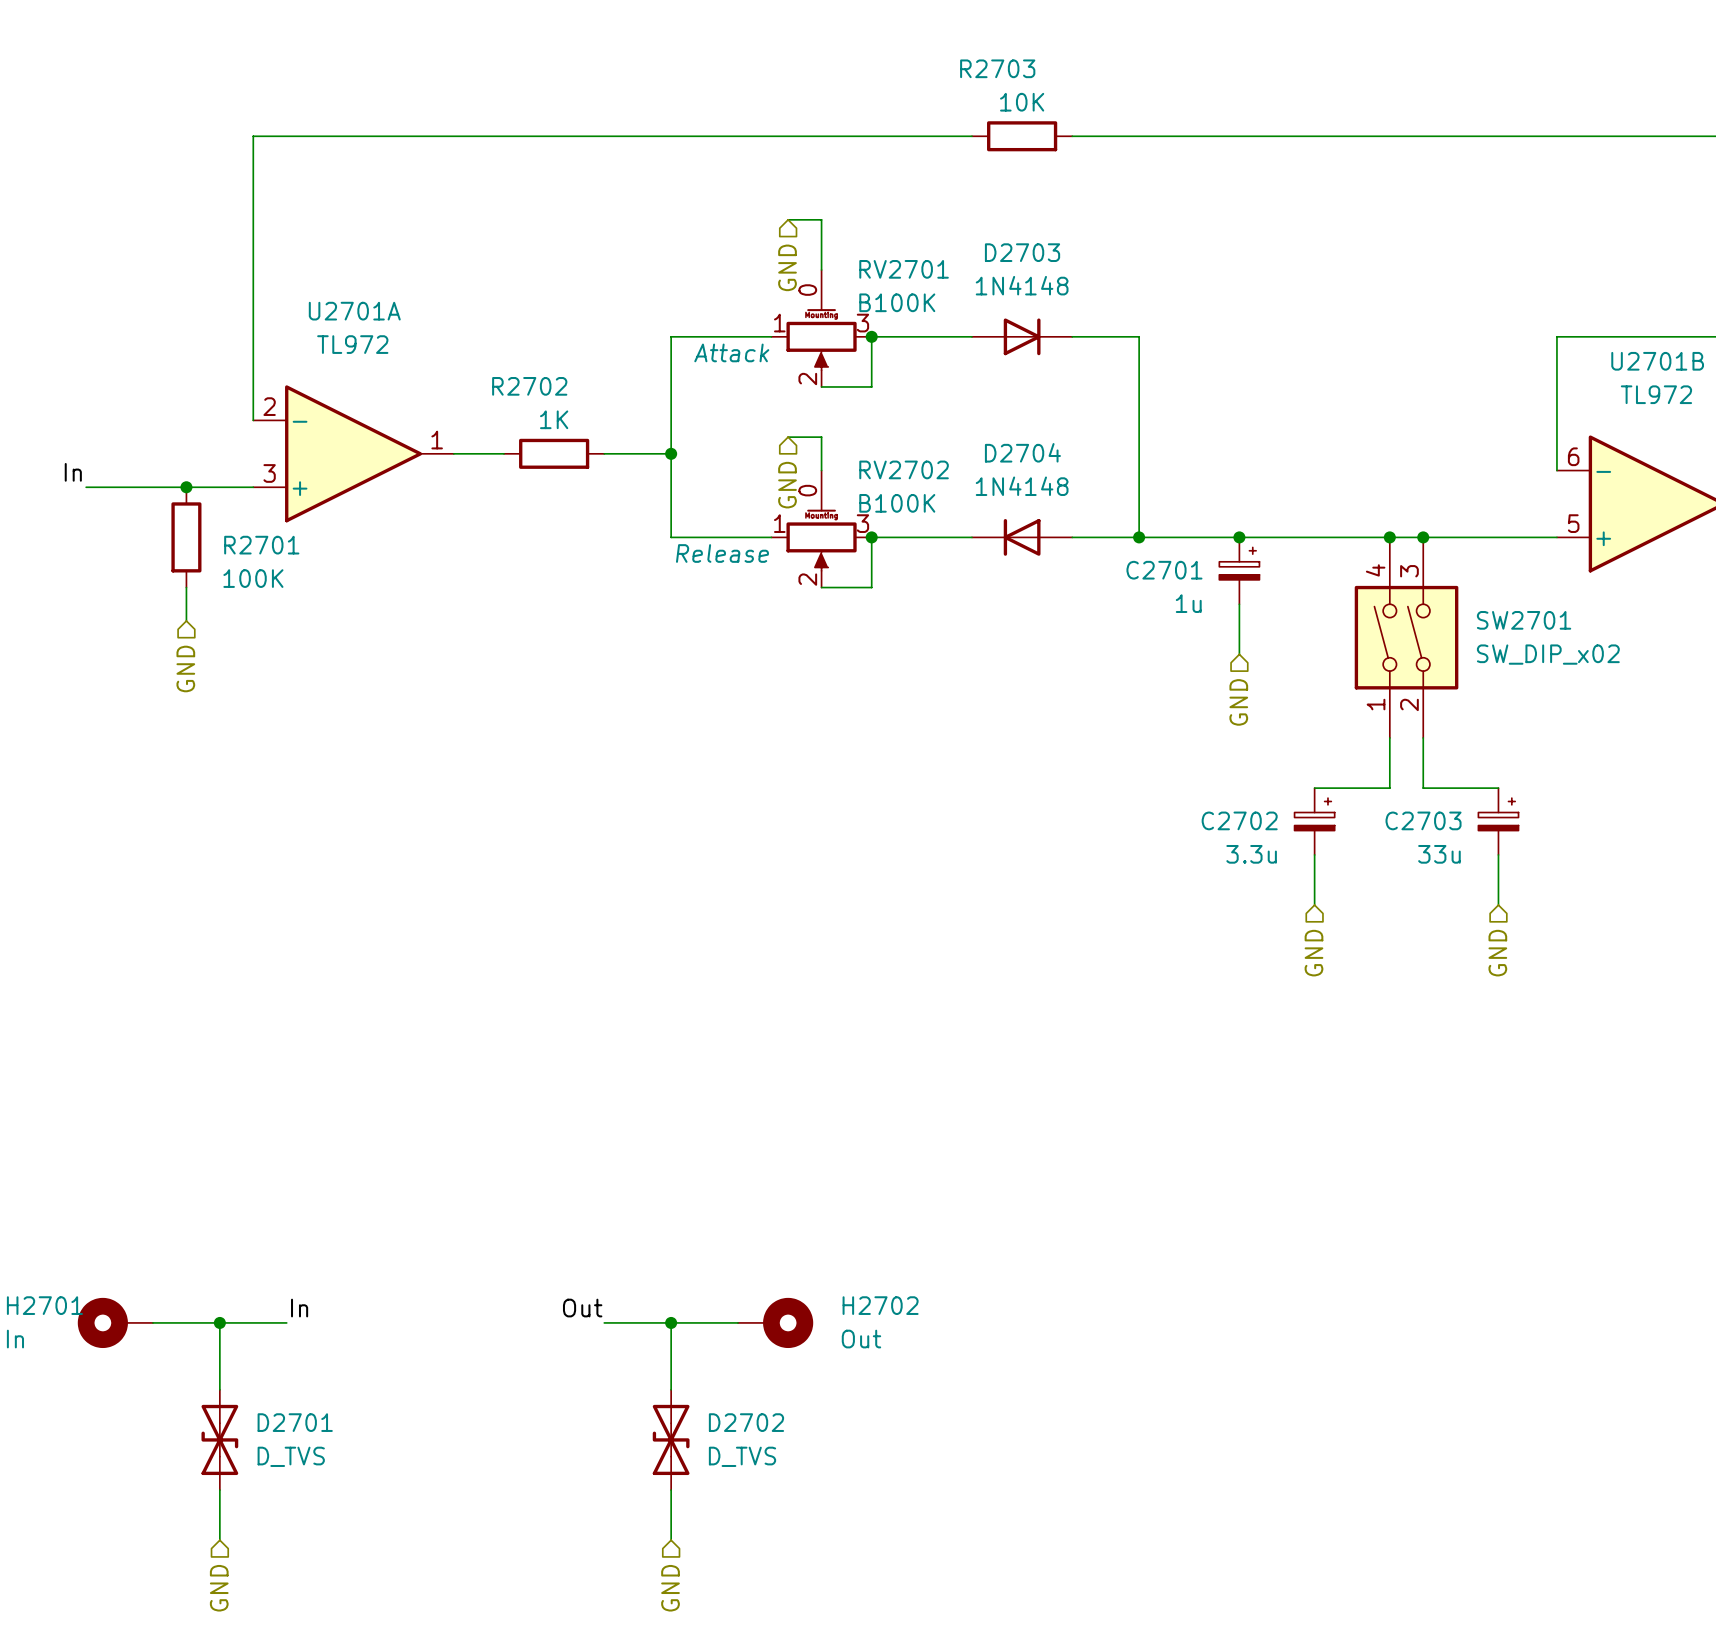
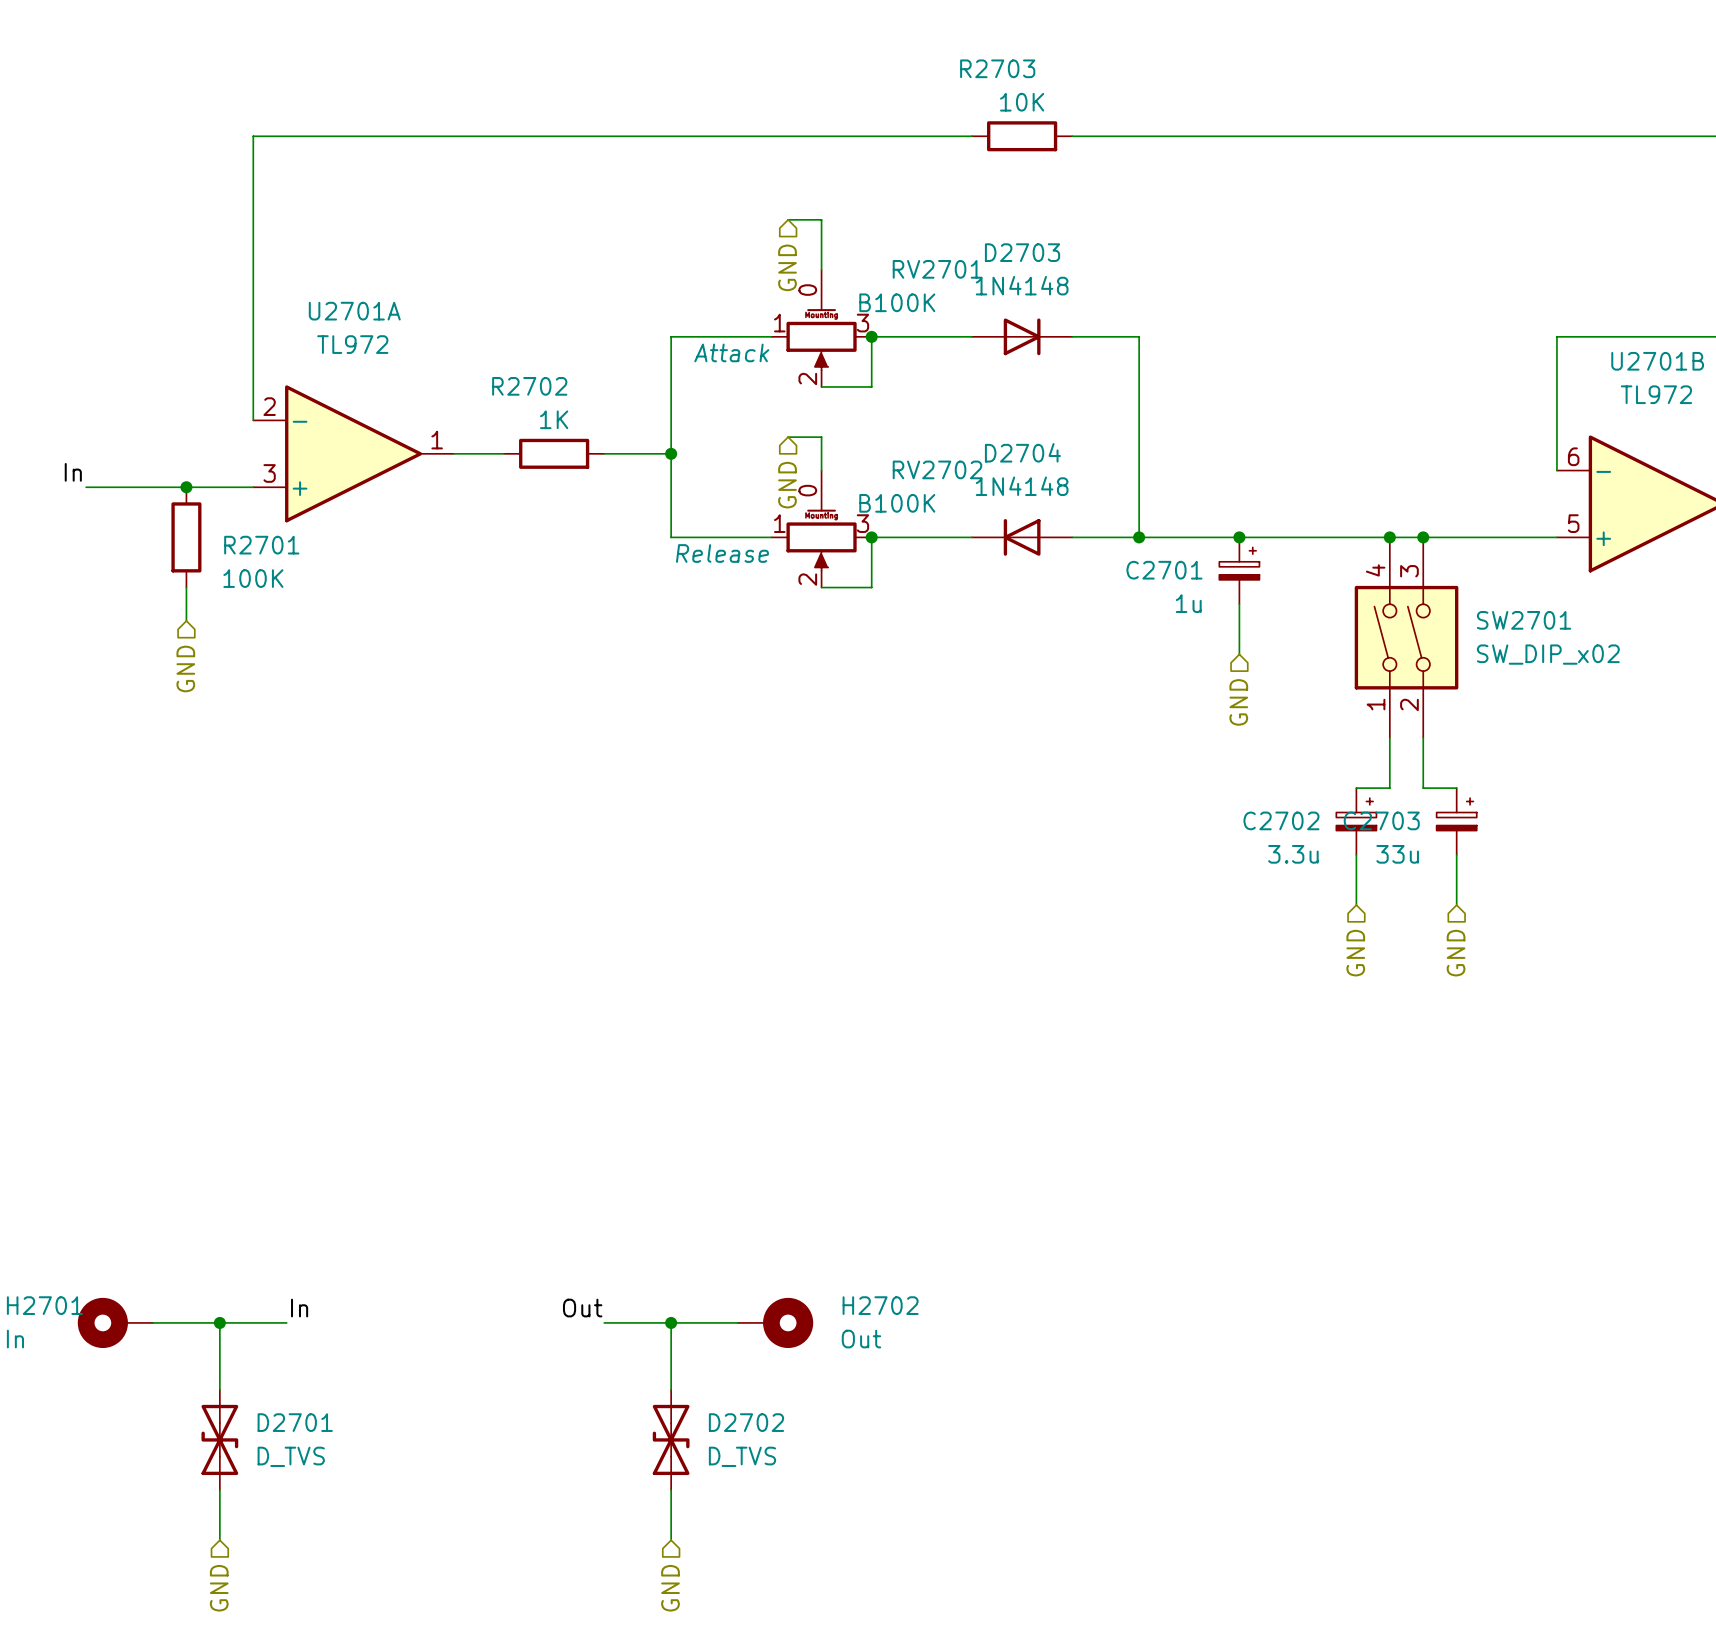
RV2701 name position: RV2701 (904, 269) -> RV2701 (937, 269)
RV2702 name position: RV2702 (904, 469) -> RV2702 (937, 469)
wire: (1314, 788) (1356, 788) -> none
wire: (1456, 788) (1498, 788) -> none
C2702 position: (1314, 821) -> (1356, 821)
C2703 position: (1498, 821) -> (1456, 821)
wire: (1314, 854) (1314, 905) -> (1356, 854) (1356, 905)
wire: (1498, 854) (1498, 905) -> (1456, 854) (1456, 905)
hierarchical label position: GND (1313, 953) -> GND (1355, 953)
hierarchical label position: GND (1497, 953) -> GND (1456, 953)

